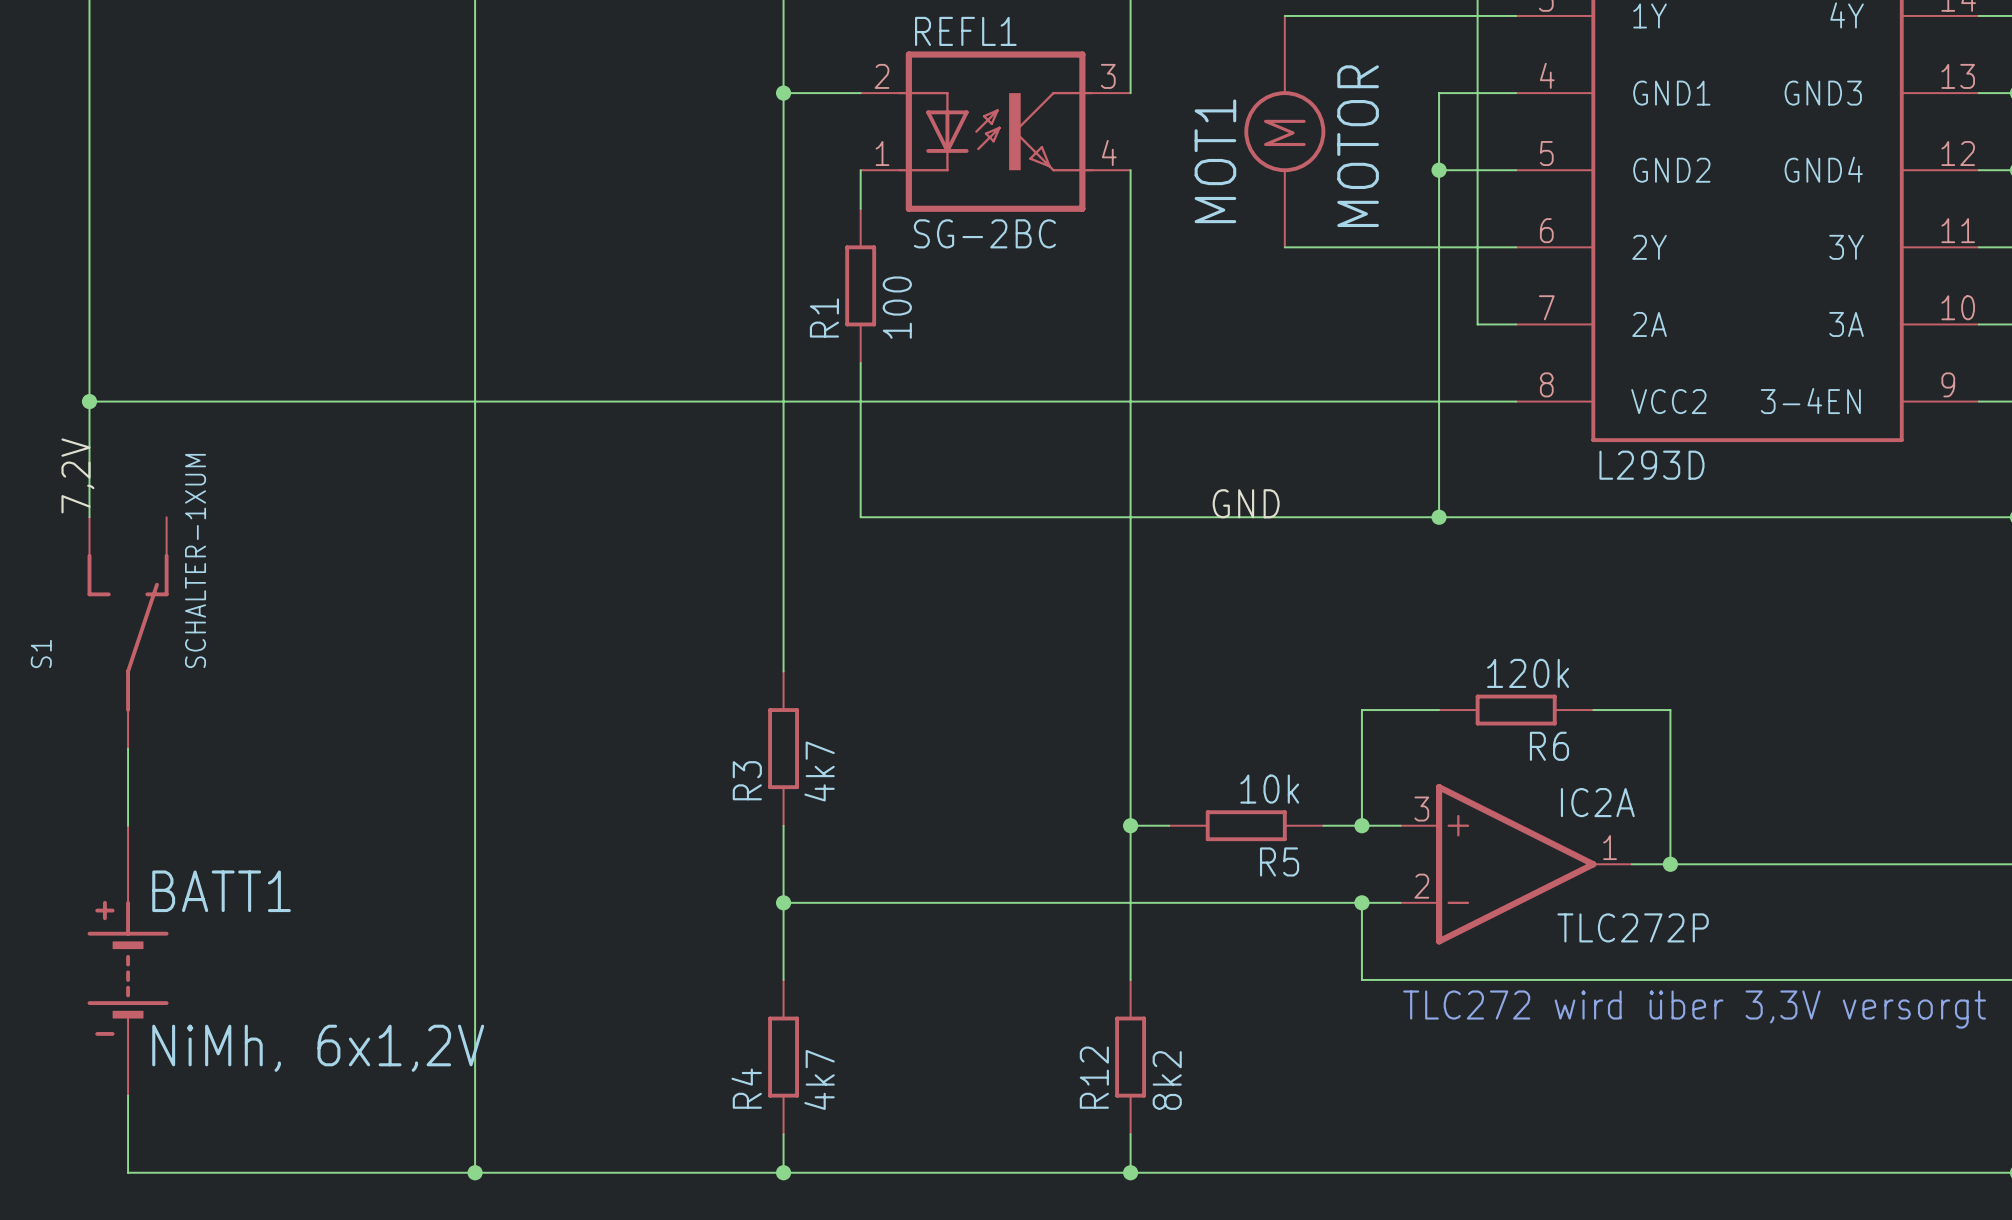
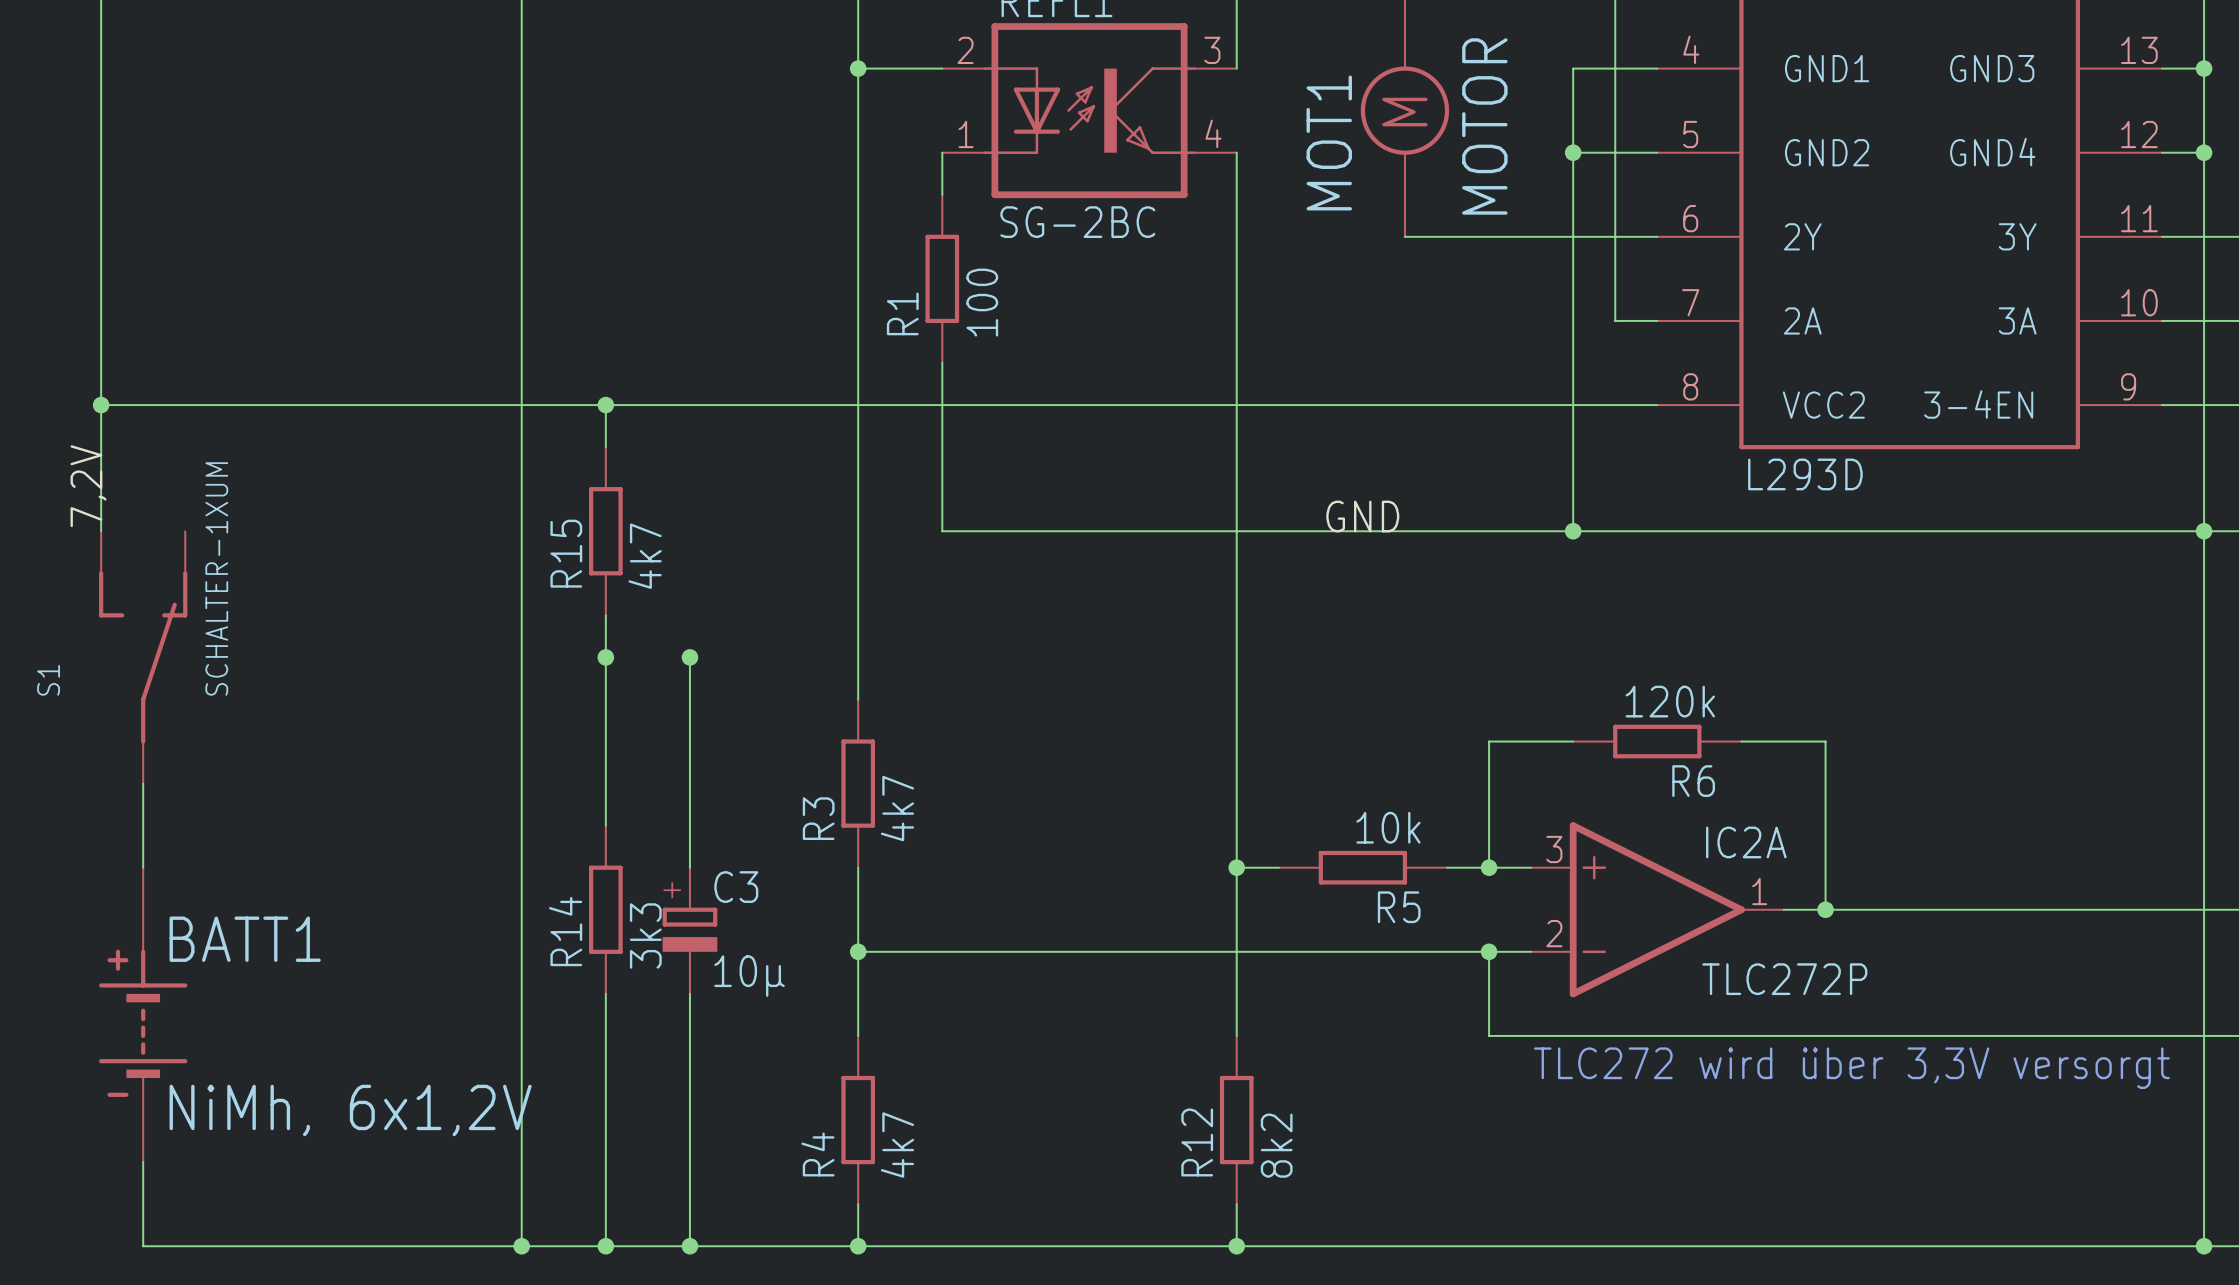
wire: none -> (605, 405) (605, 447)
junction: none -> (605, 405)
R15: none -> 4k7 (605, 531)
wire: none -> (605, 615) (605, 825)
junction: none -> (605, 657)
wire: none -> (689, 657) (689, 867)
junction: none -> (689, 657)
R14: none -> 3k3 (605, 909)
C3: none -> 10µ (689, 930)
wire: none -> (605, 993) (605, 1246)
wire: none -> (689, 993) (689, 1246)
junction: none -> (605, 1246)
junction: none -> (689, 1246)

